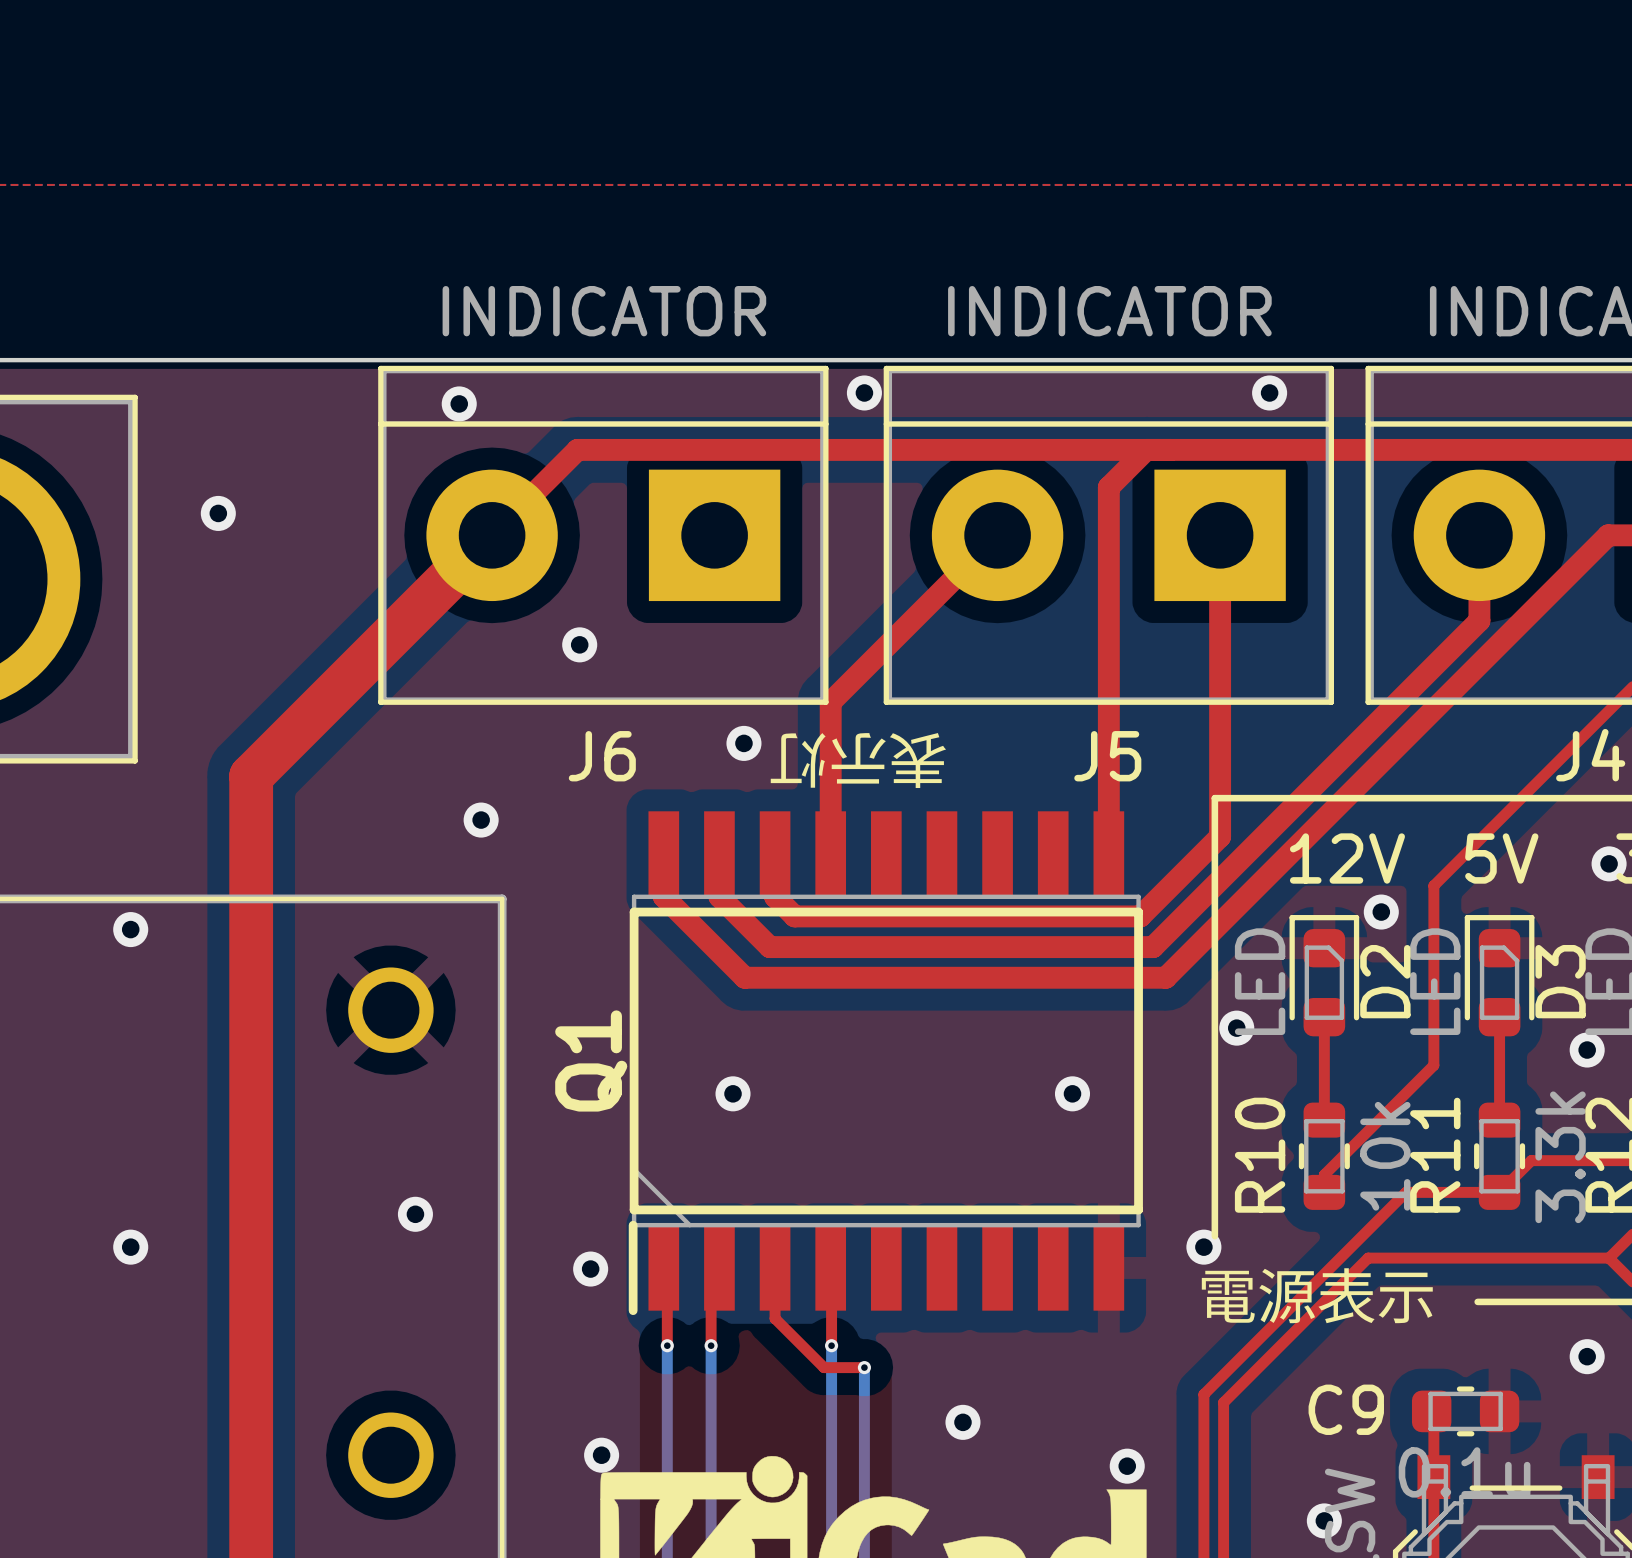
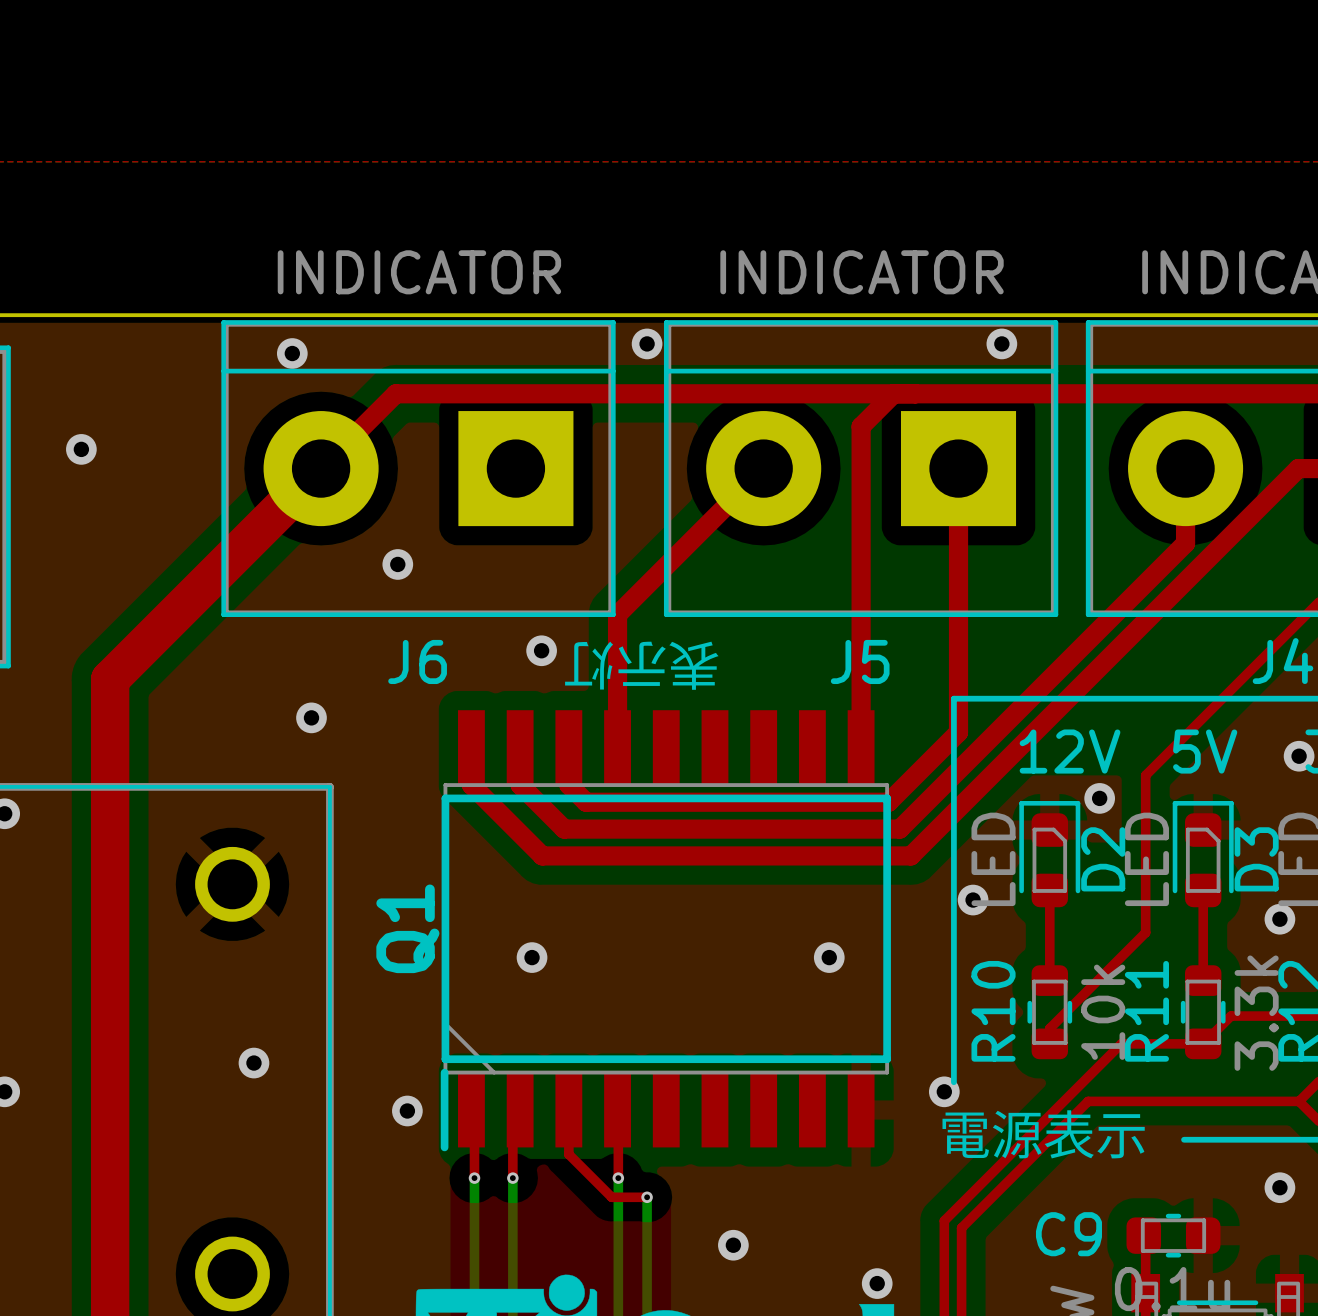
via: (601, 1455) -> none

